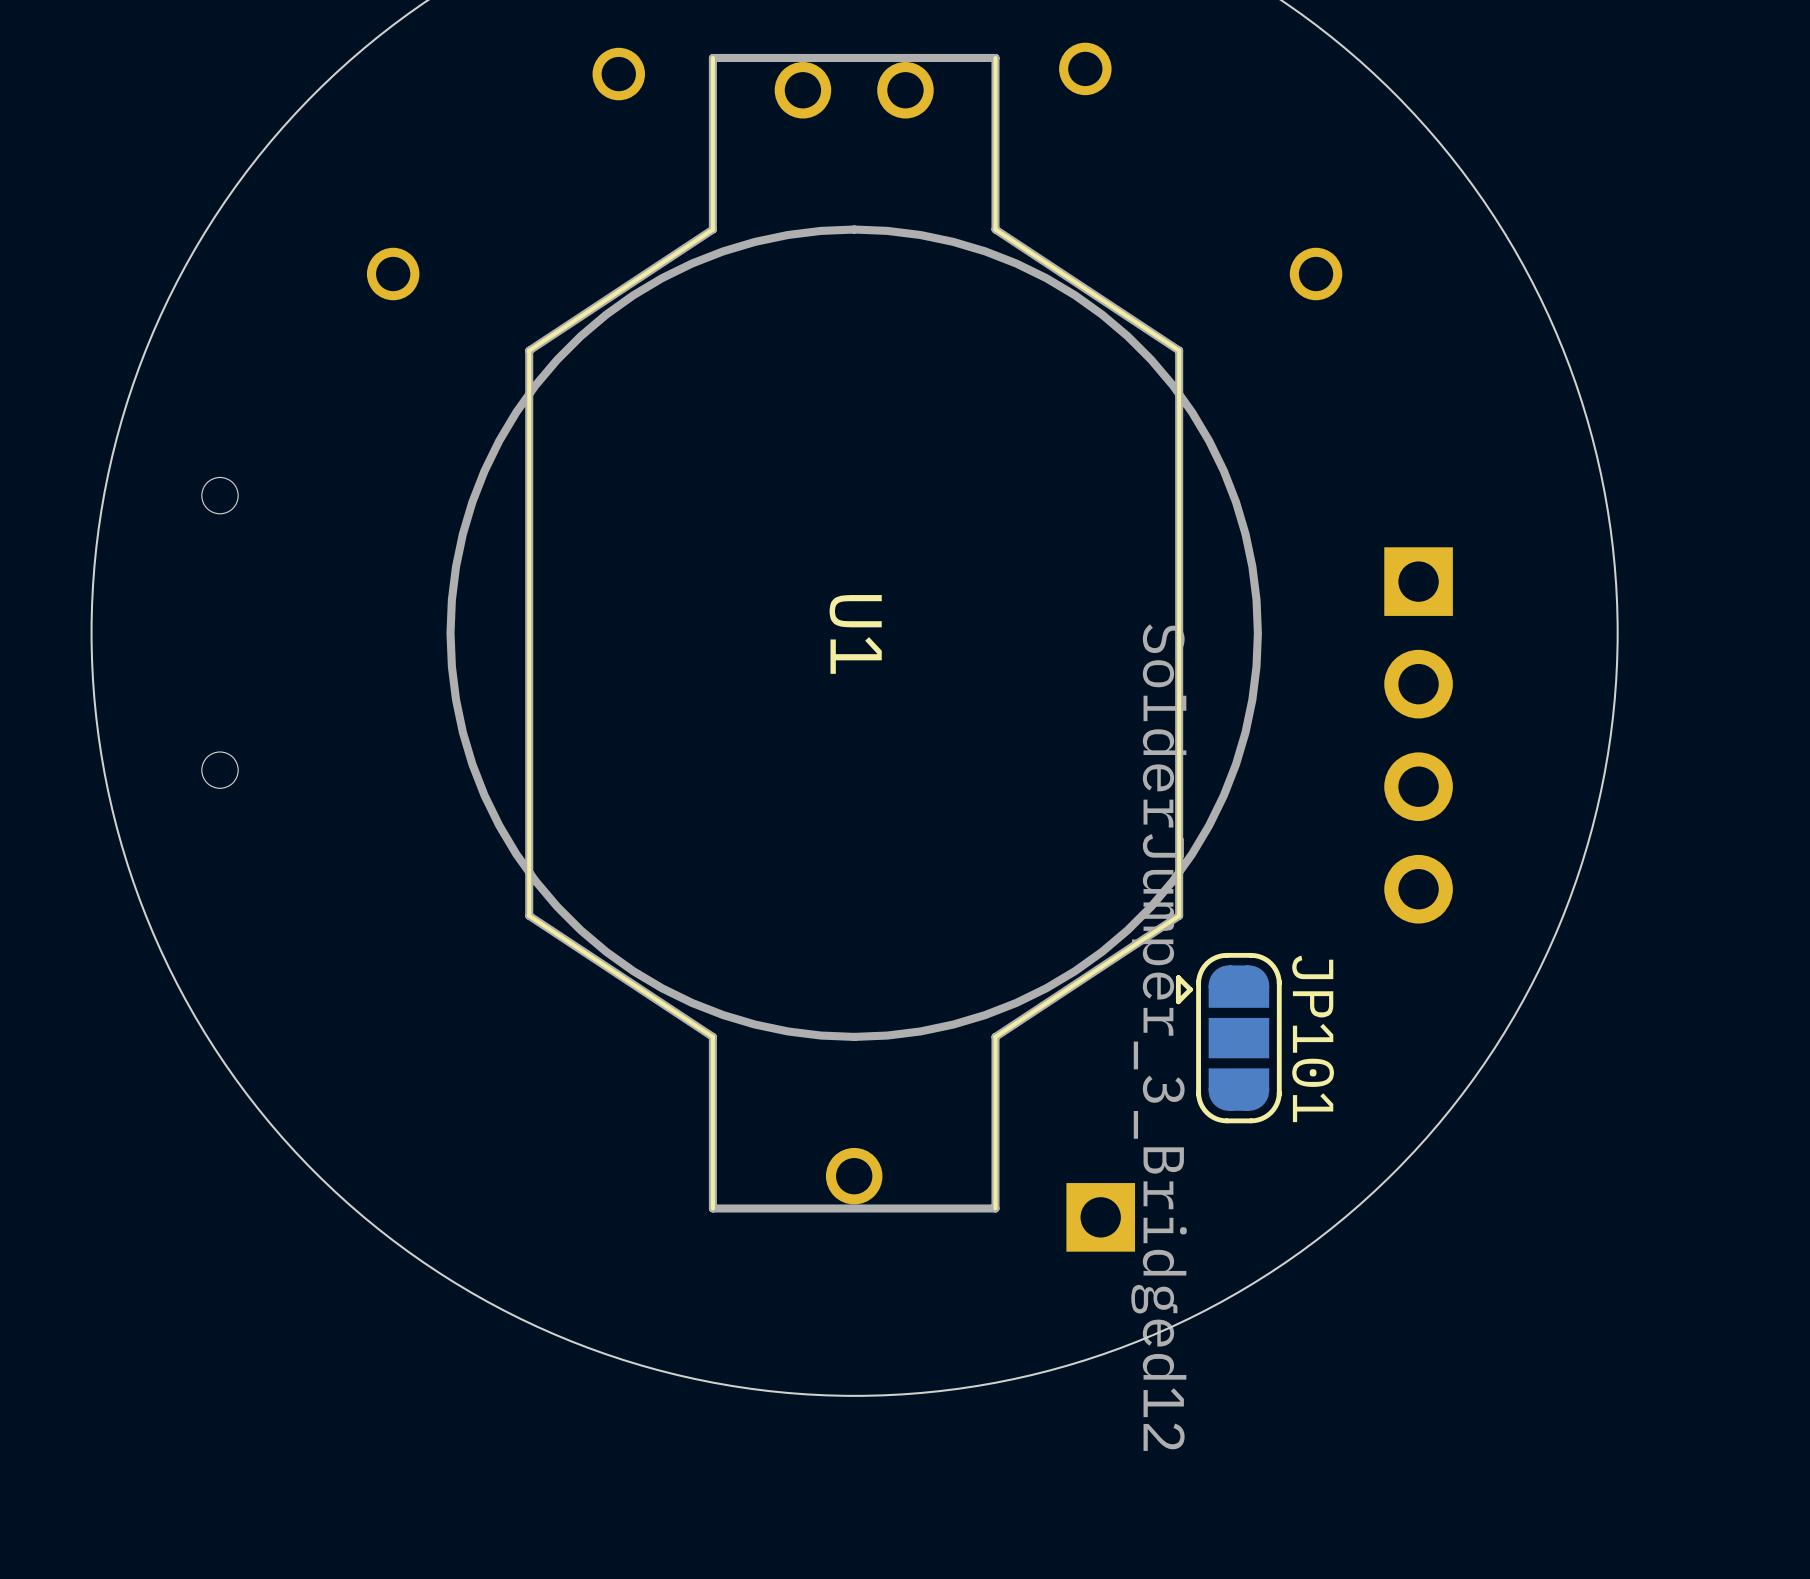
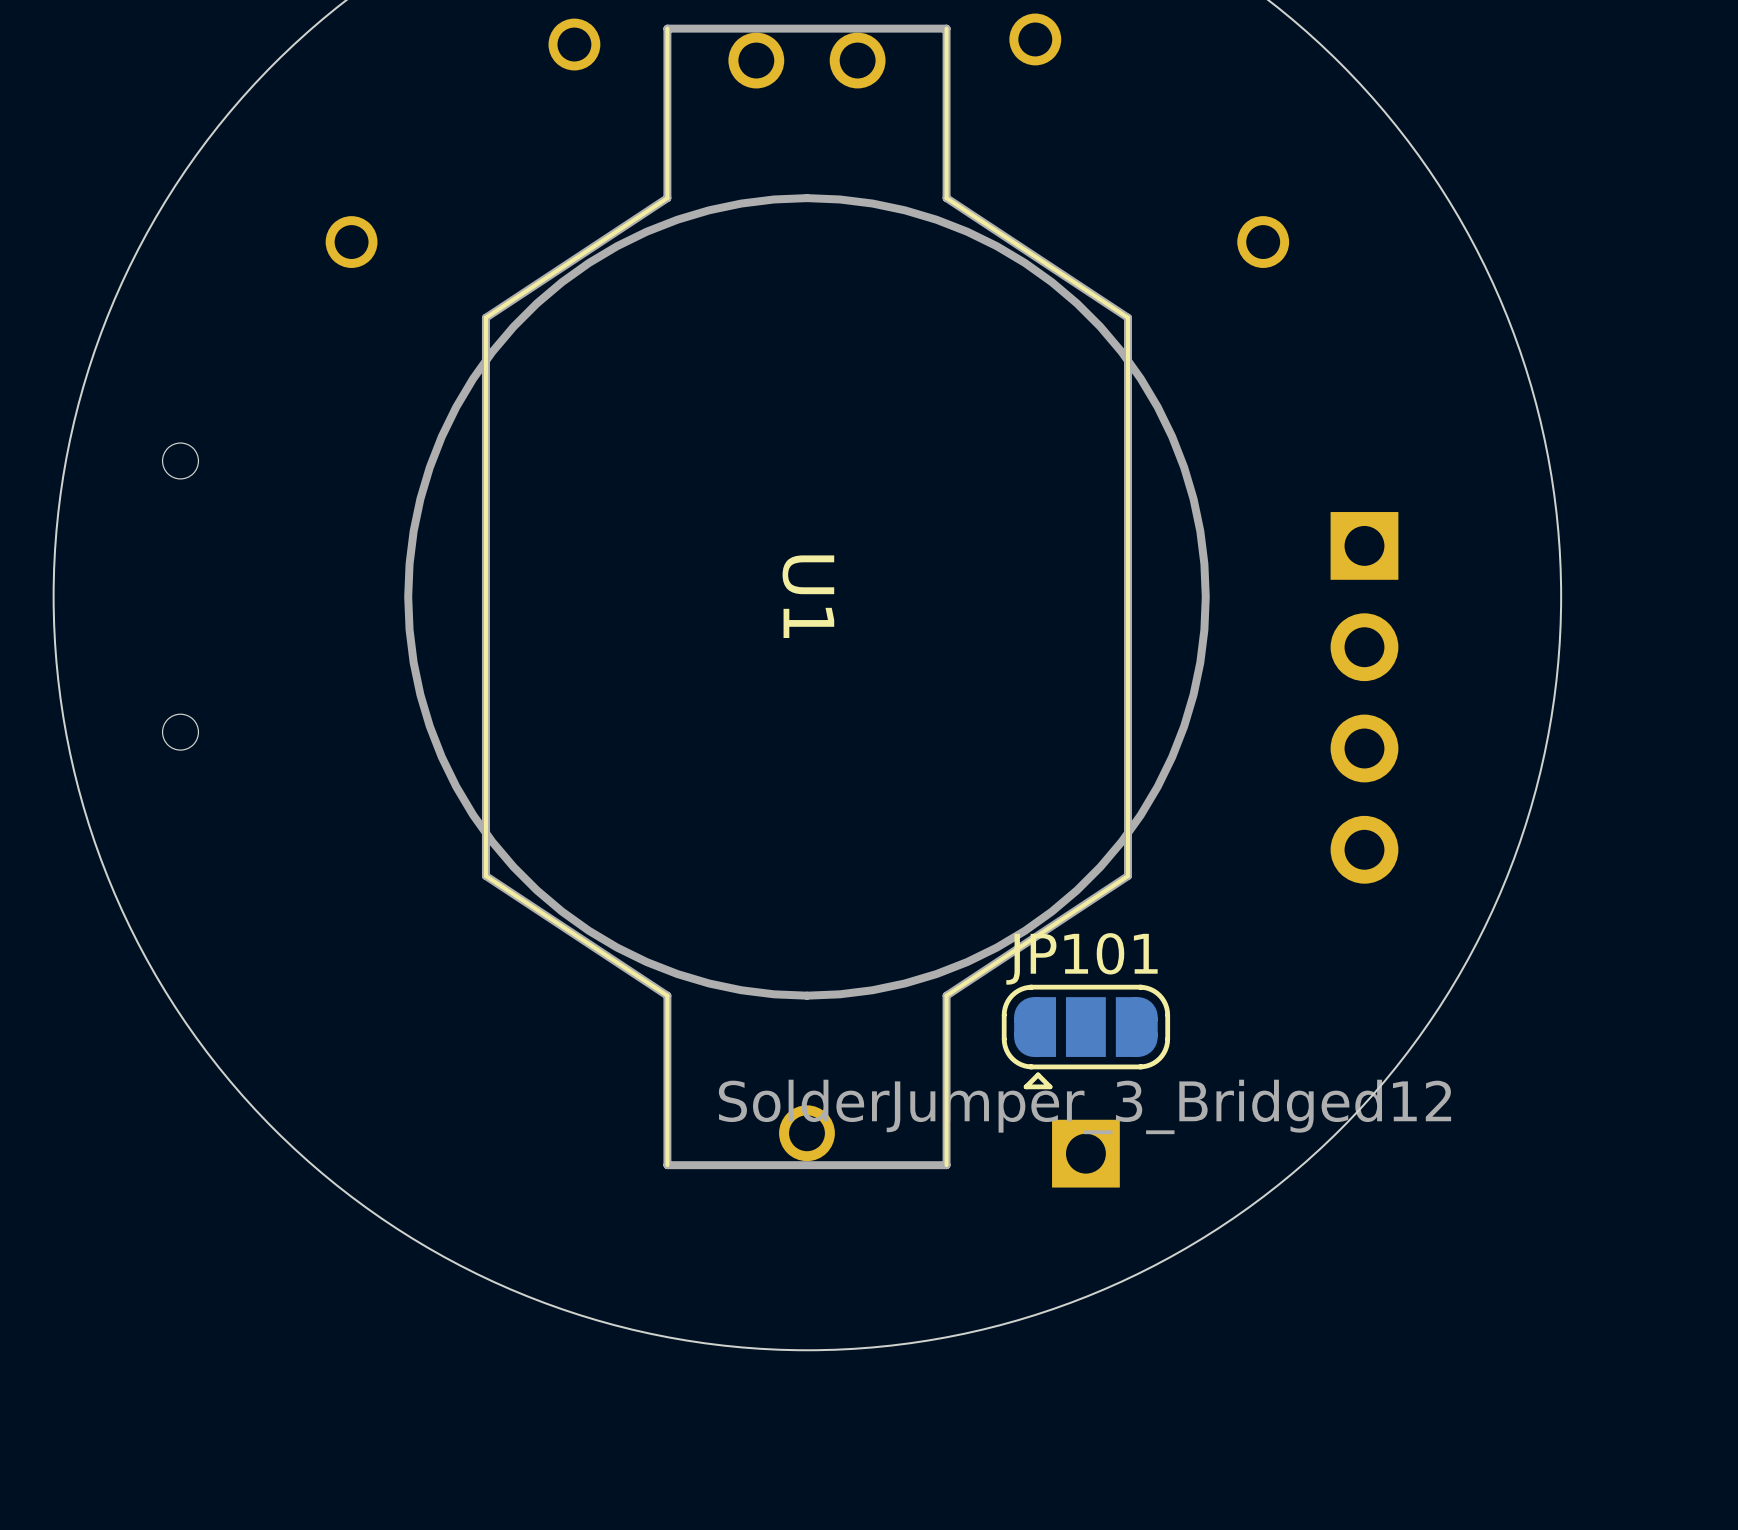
JP101 rotation: 0° (1228, 1038) -> 90° counterclockwise (1085, 1037)
part position: (1100, 1217) -> (1085, 1153)

